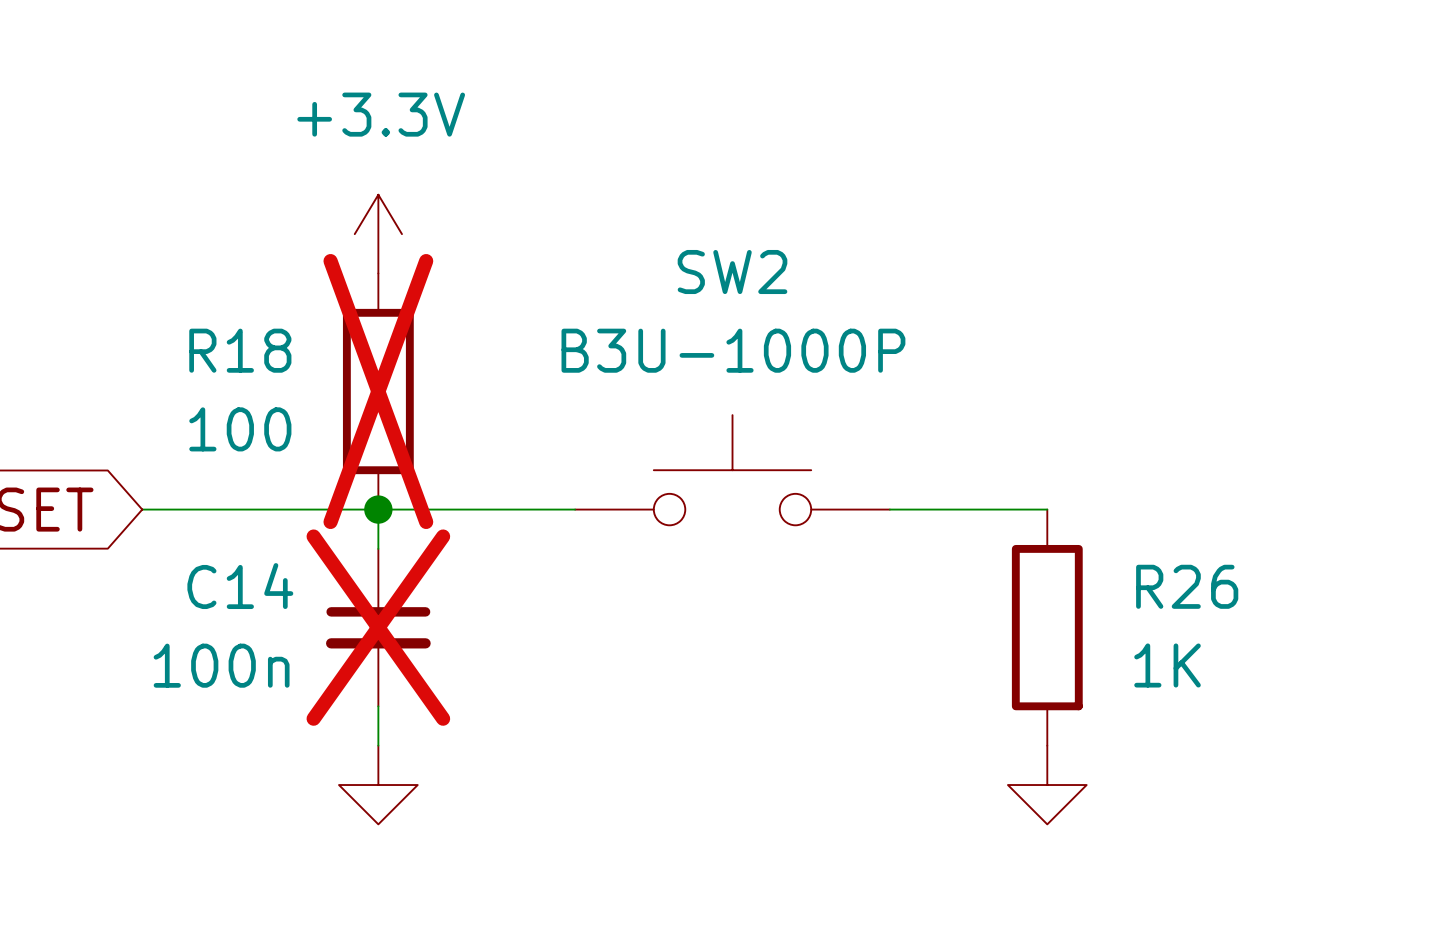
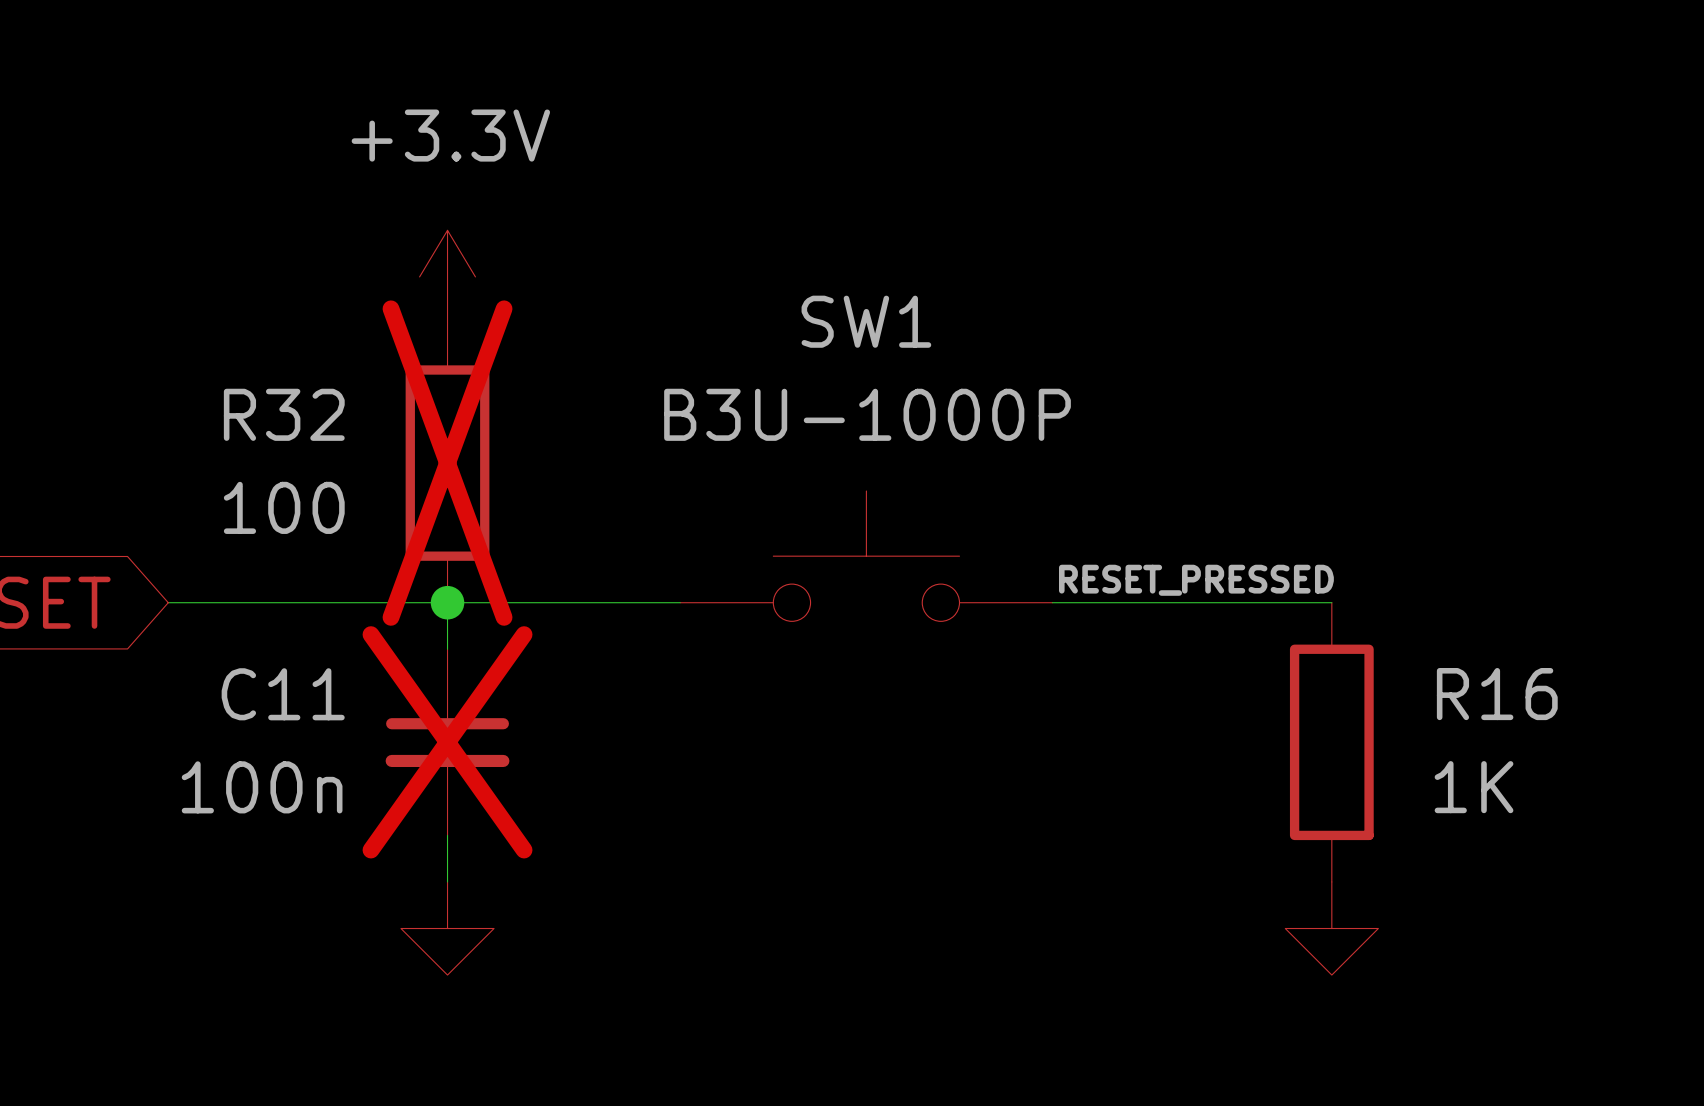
SW2 name: SW2 (732, 272) -> SW1 (866, 321)
R18 name: R18 (240, 350) -> R32 (284, 414)
label: none -> RESET_PRESSED (1196, 580)
wire: none -> (1238, 602) (1331, 602)
C14 name: C14 (240, 586) -> C11 (283, 694)
R26: 1K (1047, 627) -> none
R16: none -> 1K (1331, 742)
power symbol position: (1047, 785) -> (1331, 928)

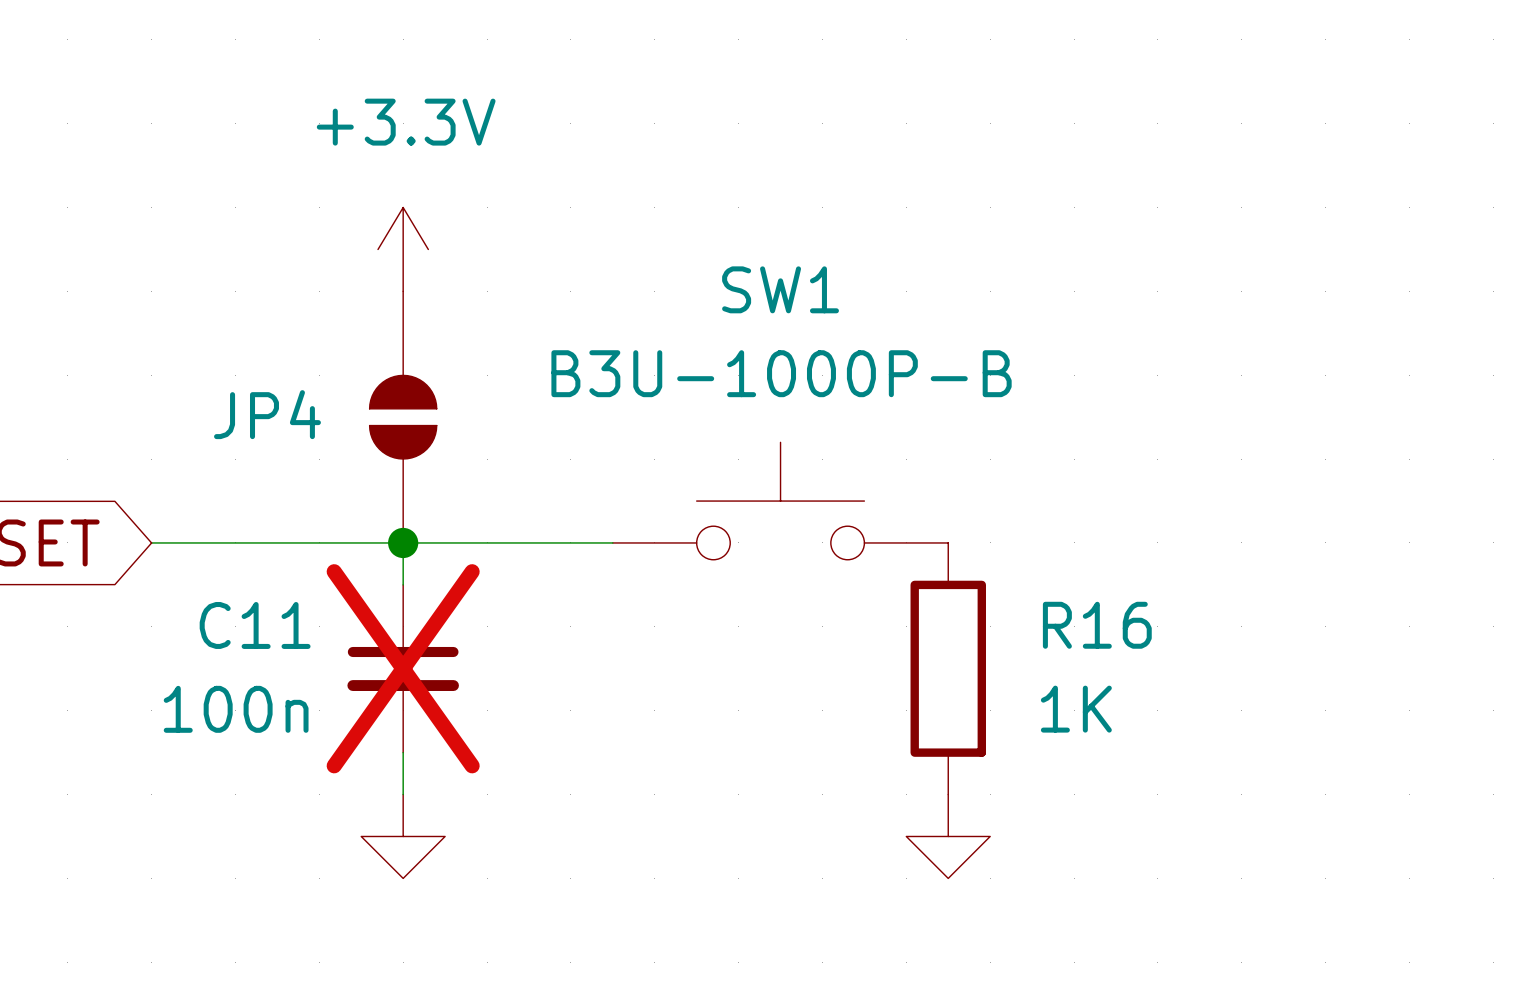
SW1 value: B3U-1000P (867, 414) -> B3U-1000P-B (781, 373)
R32: 100 (447, 463) -> none
JP4: none -> (403, 417)
label: RESET_PRESSED (1196, 580) -> none
wire: (1052, 602) (1331, 602) -> none
R16 position: (1331, 742) -> (948, 668)
power symbol position: (1331, 928) -> (948, 836)

